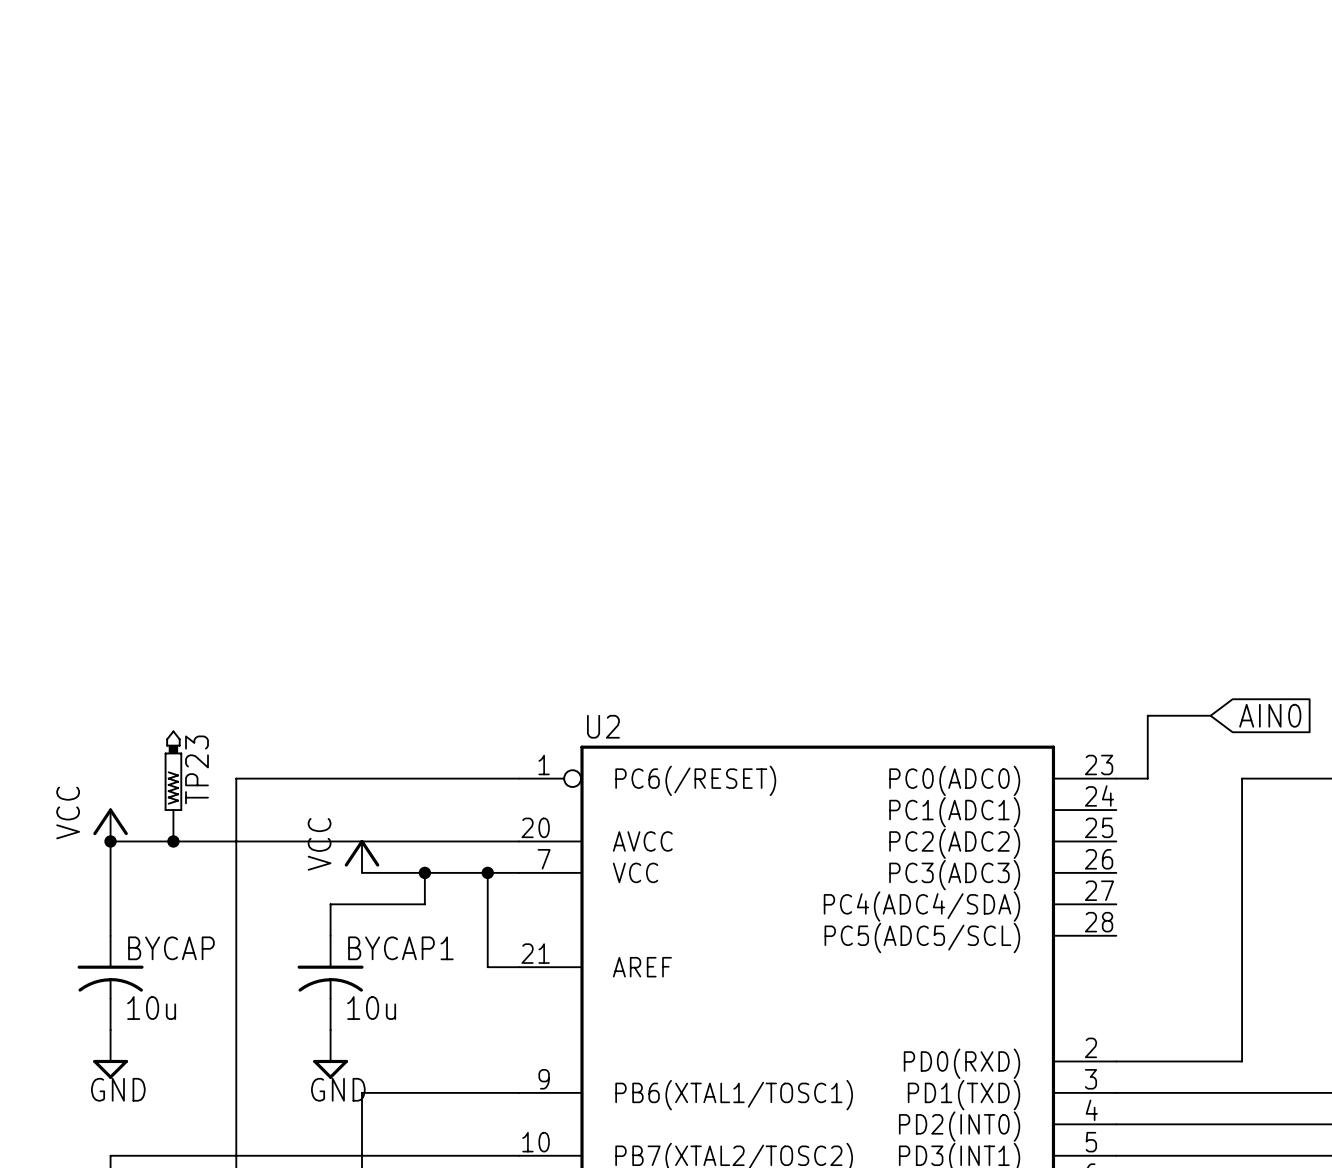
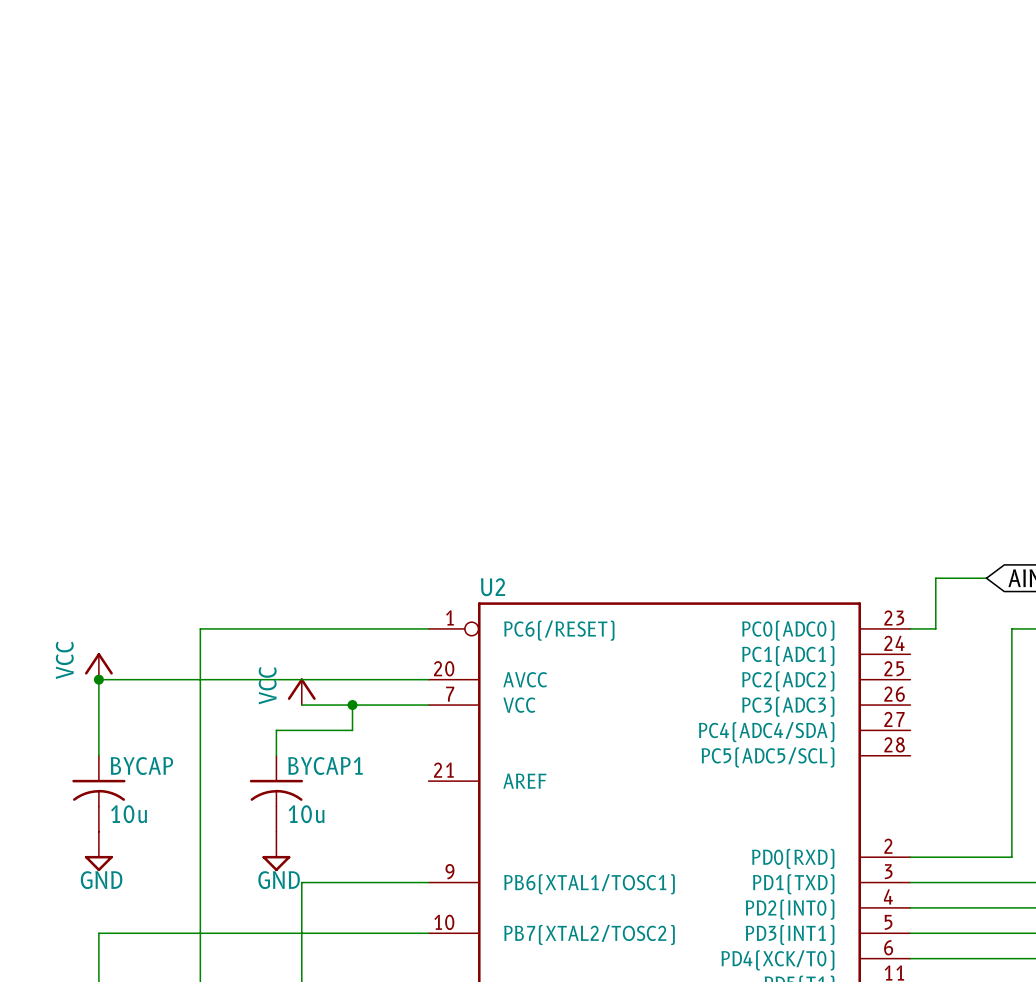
TP23: (173, 785) -> none
junction: (173, 841) -> none
wire: (487, 872) (487, 967) (519, 967) -> none
junction: (487, 872) -> none

